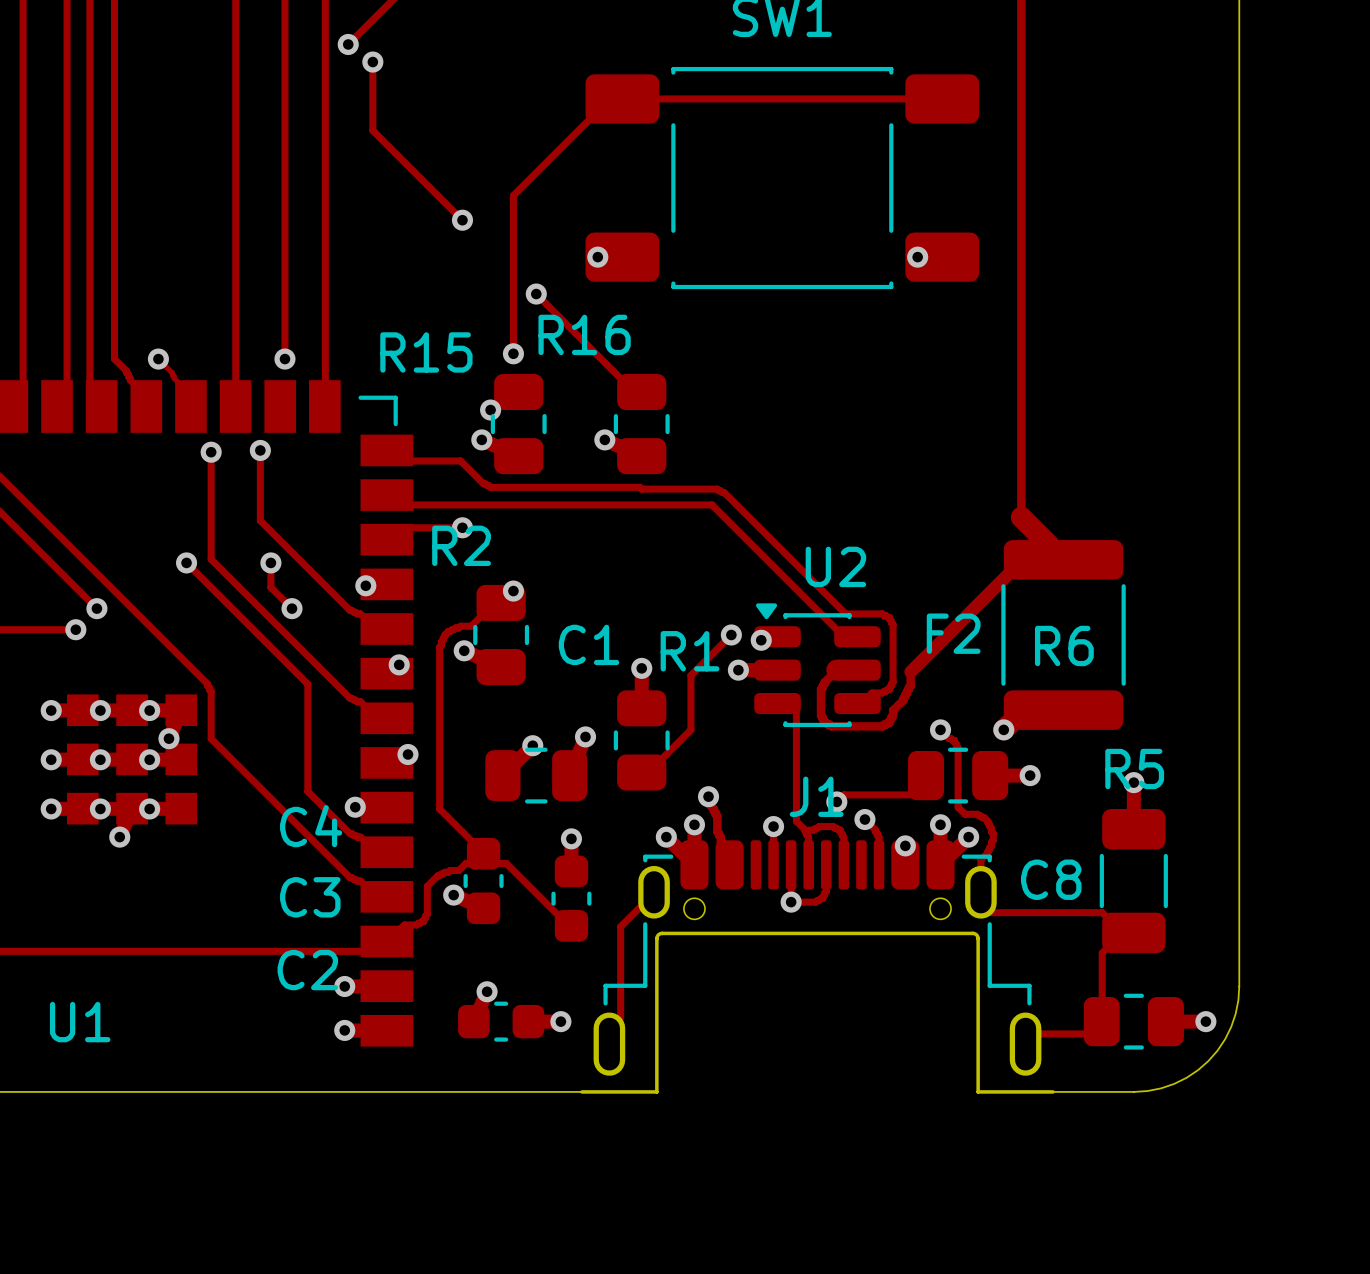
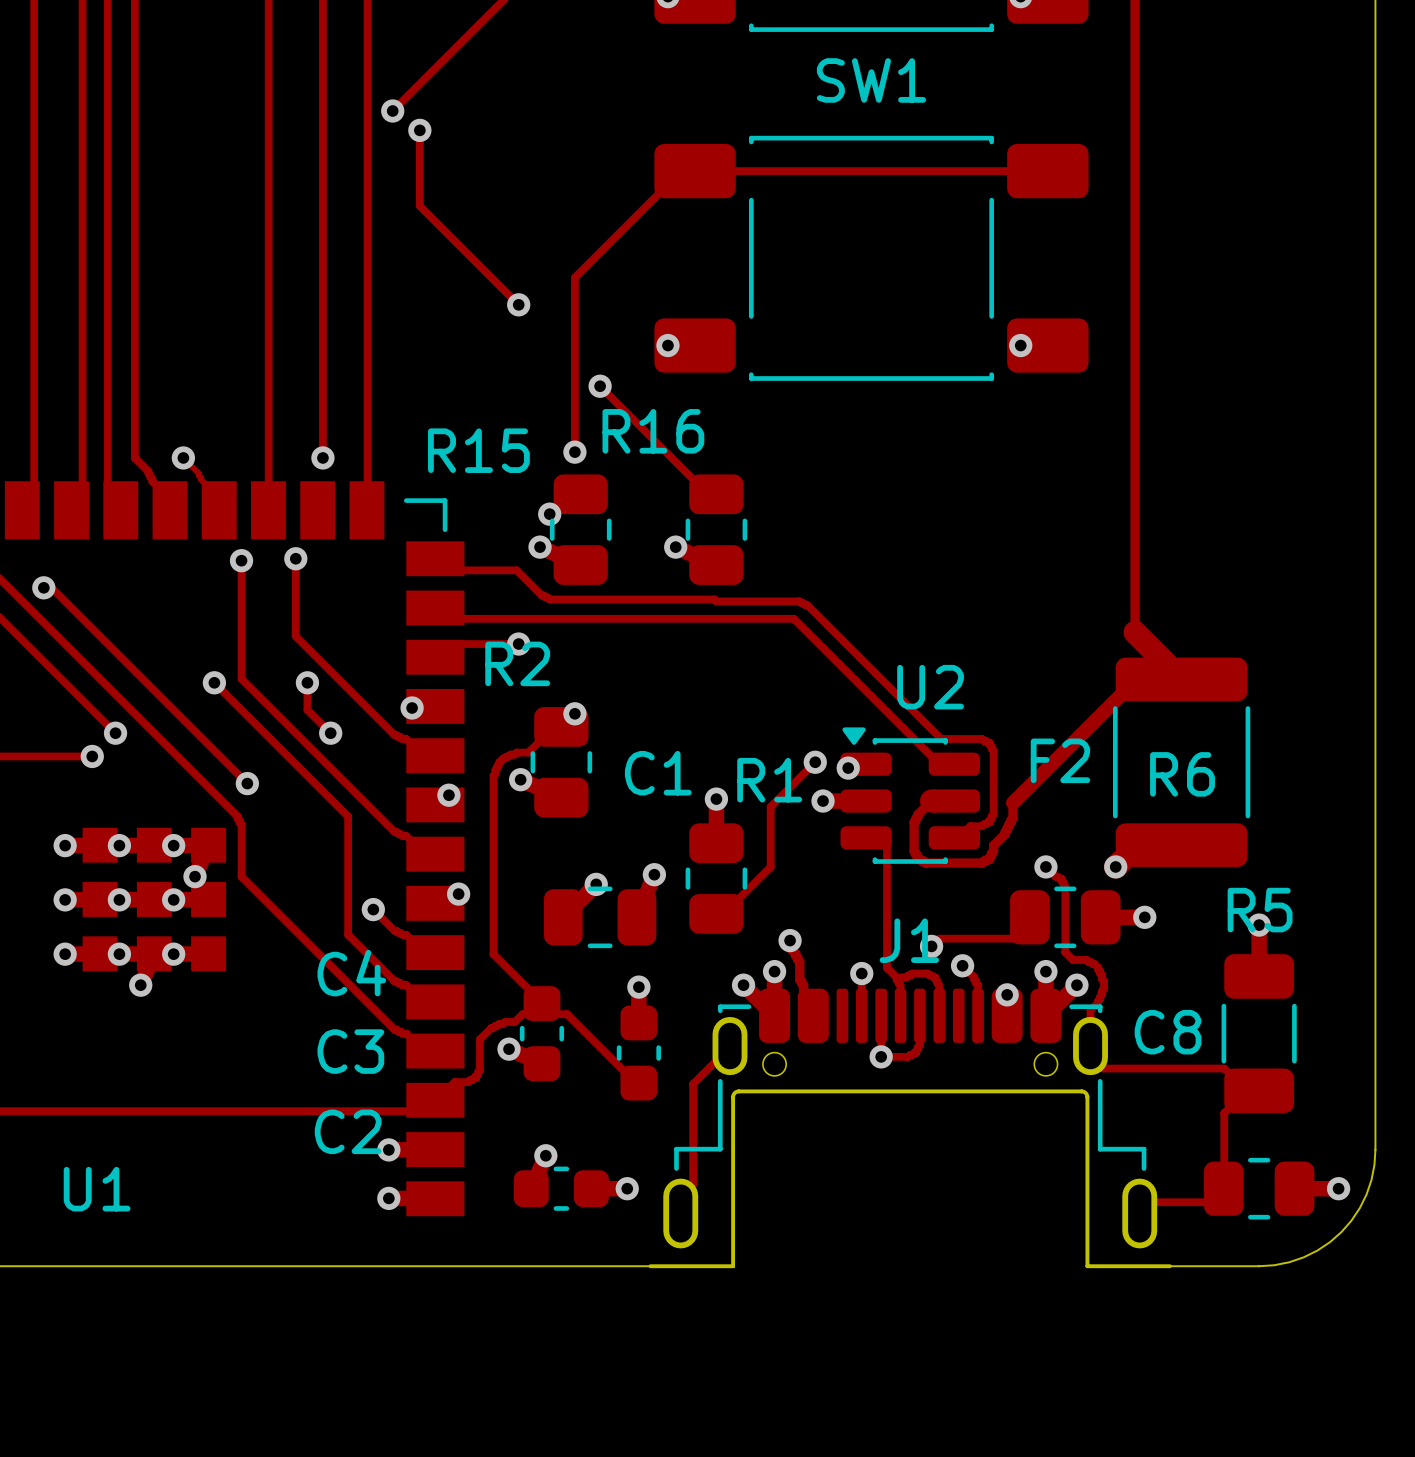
track: none -> (43, 587) (51, 587) (247, 783)
via: none -> (43, 587)
via: none -> (247, 783)
track: none -> (373, 909) (394, 930) (406, 934) (412, 940)
via position: (355, 807) -> (373, 909)

